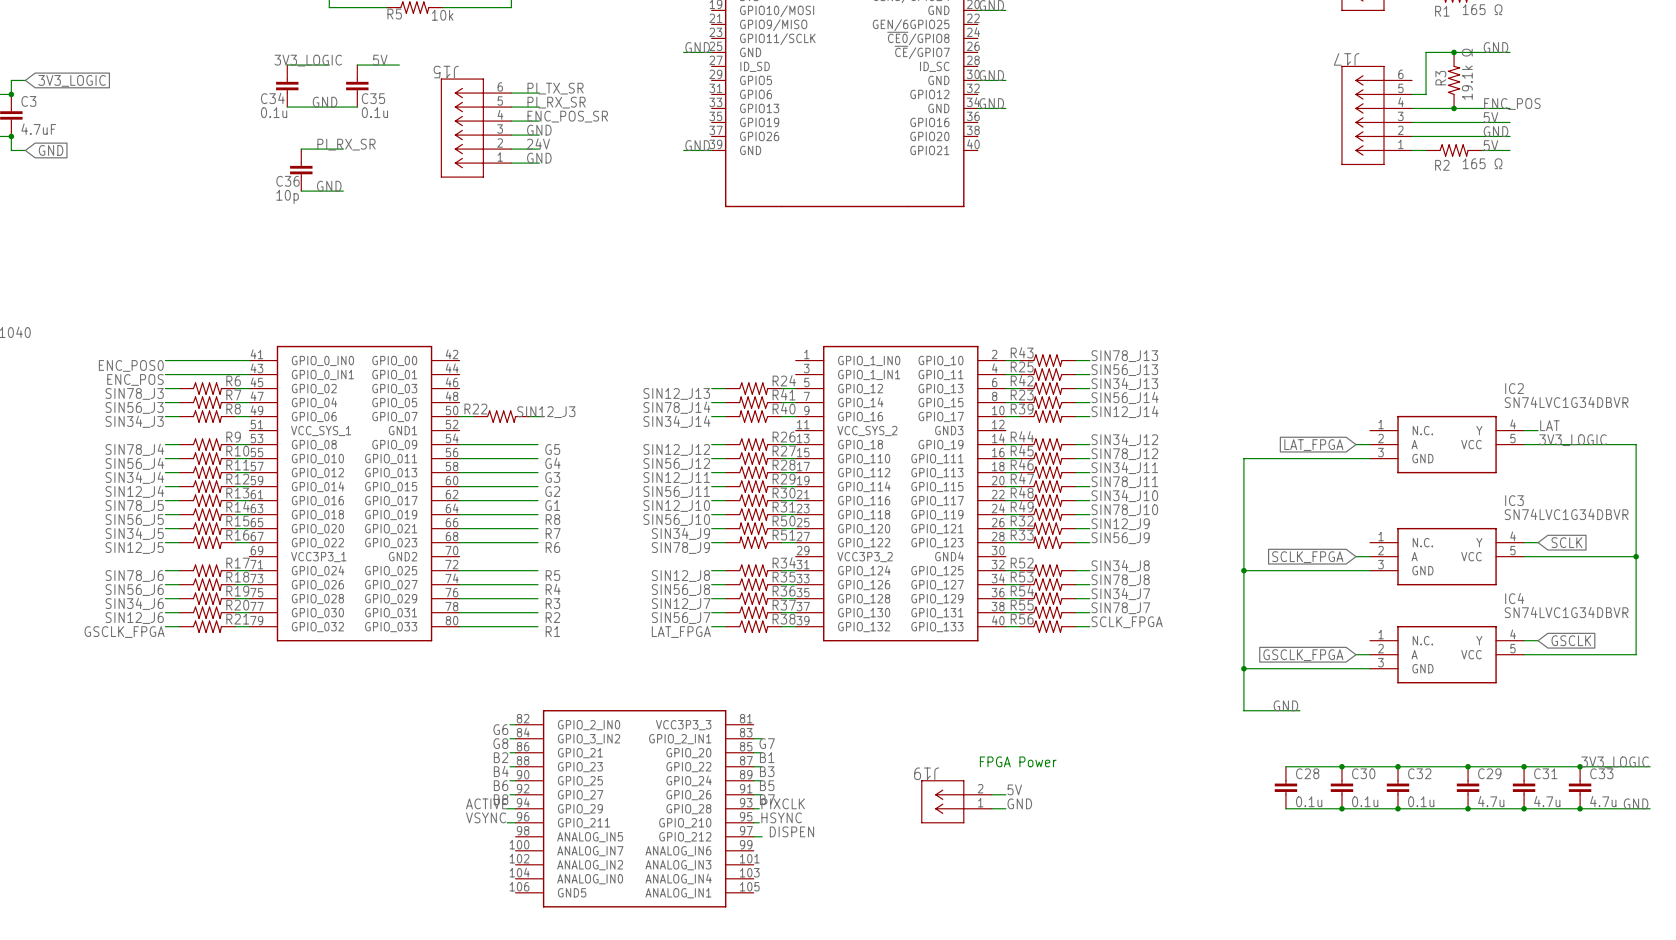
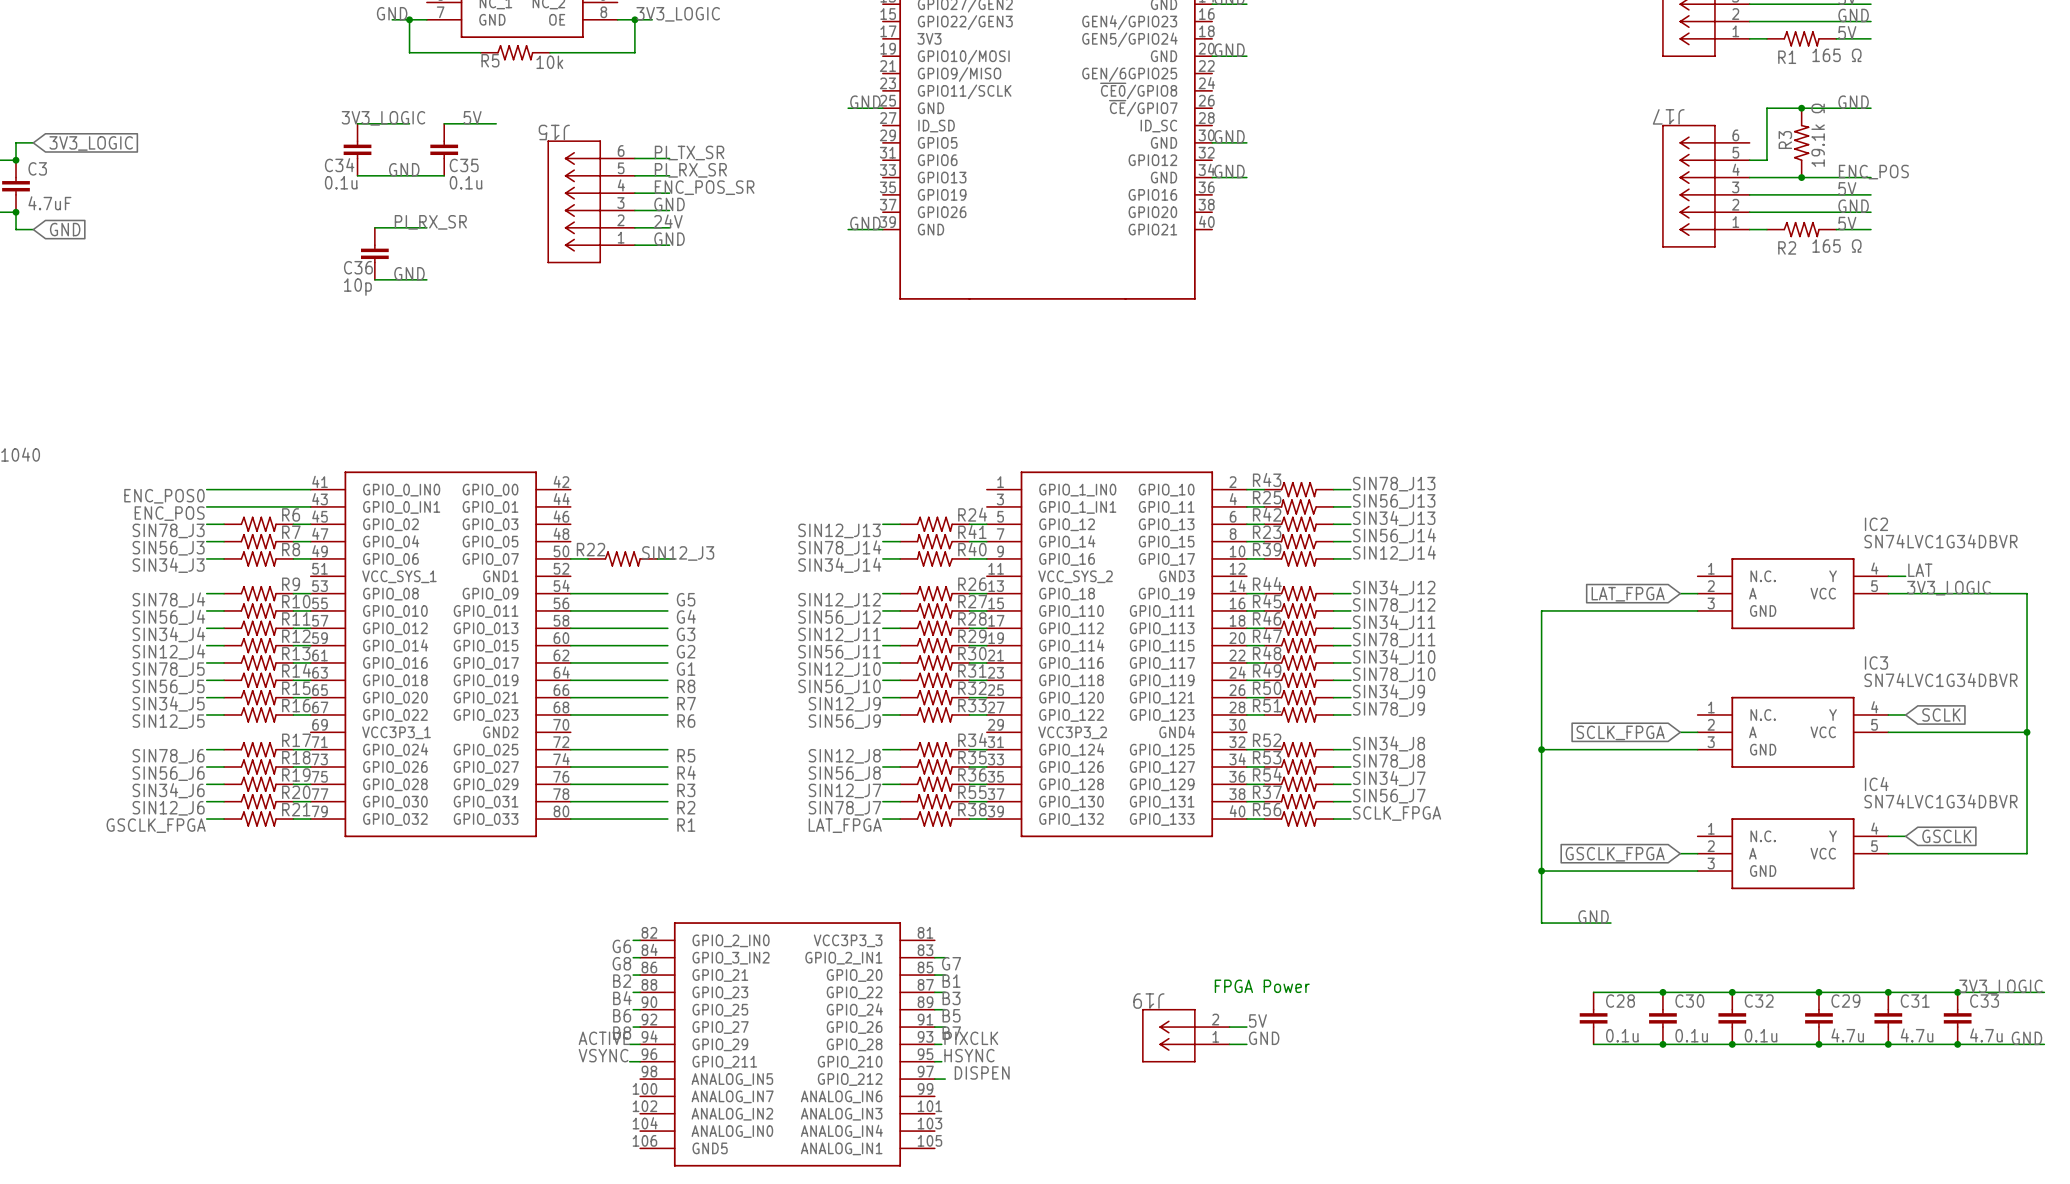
R50 name position: R50 (784, 521) -> R50 (1267, 688)
R32 name position: R32 (1022, 521) -> R32 (972, 688)
label: SIN12_J9 (1120, 524) -> SIN34_J9 (1388, 691)
R50 rotation: 0° (753, 528) -> 180° (1298, 697)
R50 position: (753, 528) -> (1298, 697)
R32 rotation: 0° (1047, 528) -> 180° (934, 697)
R32 position: (1047, 528) -> (934, 697)
label: SIN34_J9 (680, 533) -> SIN12_J9 (844, 704)
R51 name position: R51 (784, 535) -> R51 (1267, 705)
R33 name position: R33 (1022, 535) -> R33 (972, 705)
label: SIN56_J9 (1120, 538) -> SIN78_J9 (1388, 709)
R51 rotation: 0° (753, 542) -> 180° (1298, 714)
R51 position: (753, 542) -> (1298, 714)
R33 rotation: 0° (1047, 542) -> 180° (934, 714)
R33 position: (1047, 542) -> (934, 714)
label: SIN78_J9 (680, 548) -> SIN56_J9 (844, 721)
R37 name position: R37 (784, 605) -> R37 (1267, 792)
R55 name position: R55 (1022, 605) -> R55 (972, 792)
label: SIN78_J7 (1120, 608) -> SIN56_J7 (1389, 796)
R37 rotation: 0° (753, 612) -> 180° (1298, 801)
R37 position: (753, 612) -> (1298, 801)
R55 rotation: 0° (1047, 612) -> 180° (934, 801)
R55 position: (1047, 612) -> (934, 801)
label: SIN56_J7 (681, 618) -> SIN78_J7 (844, 808)

